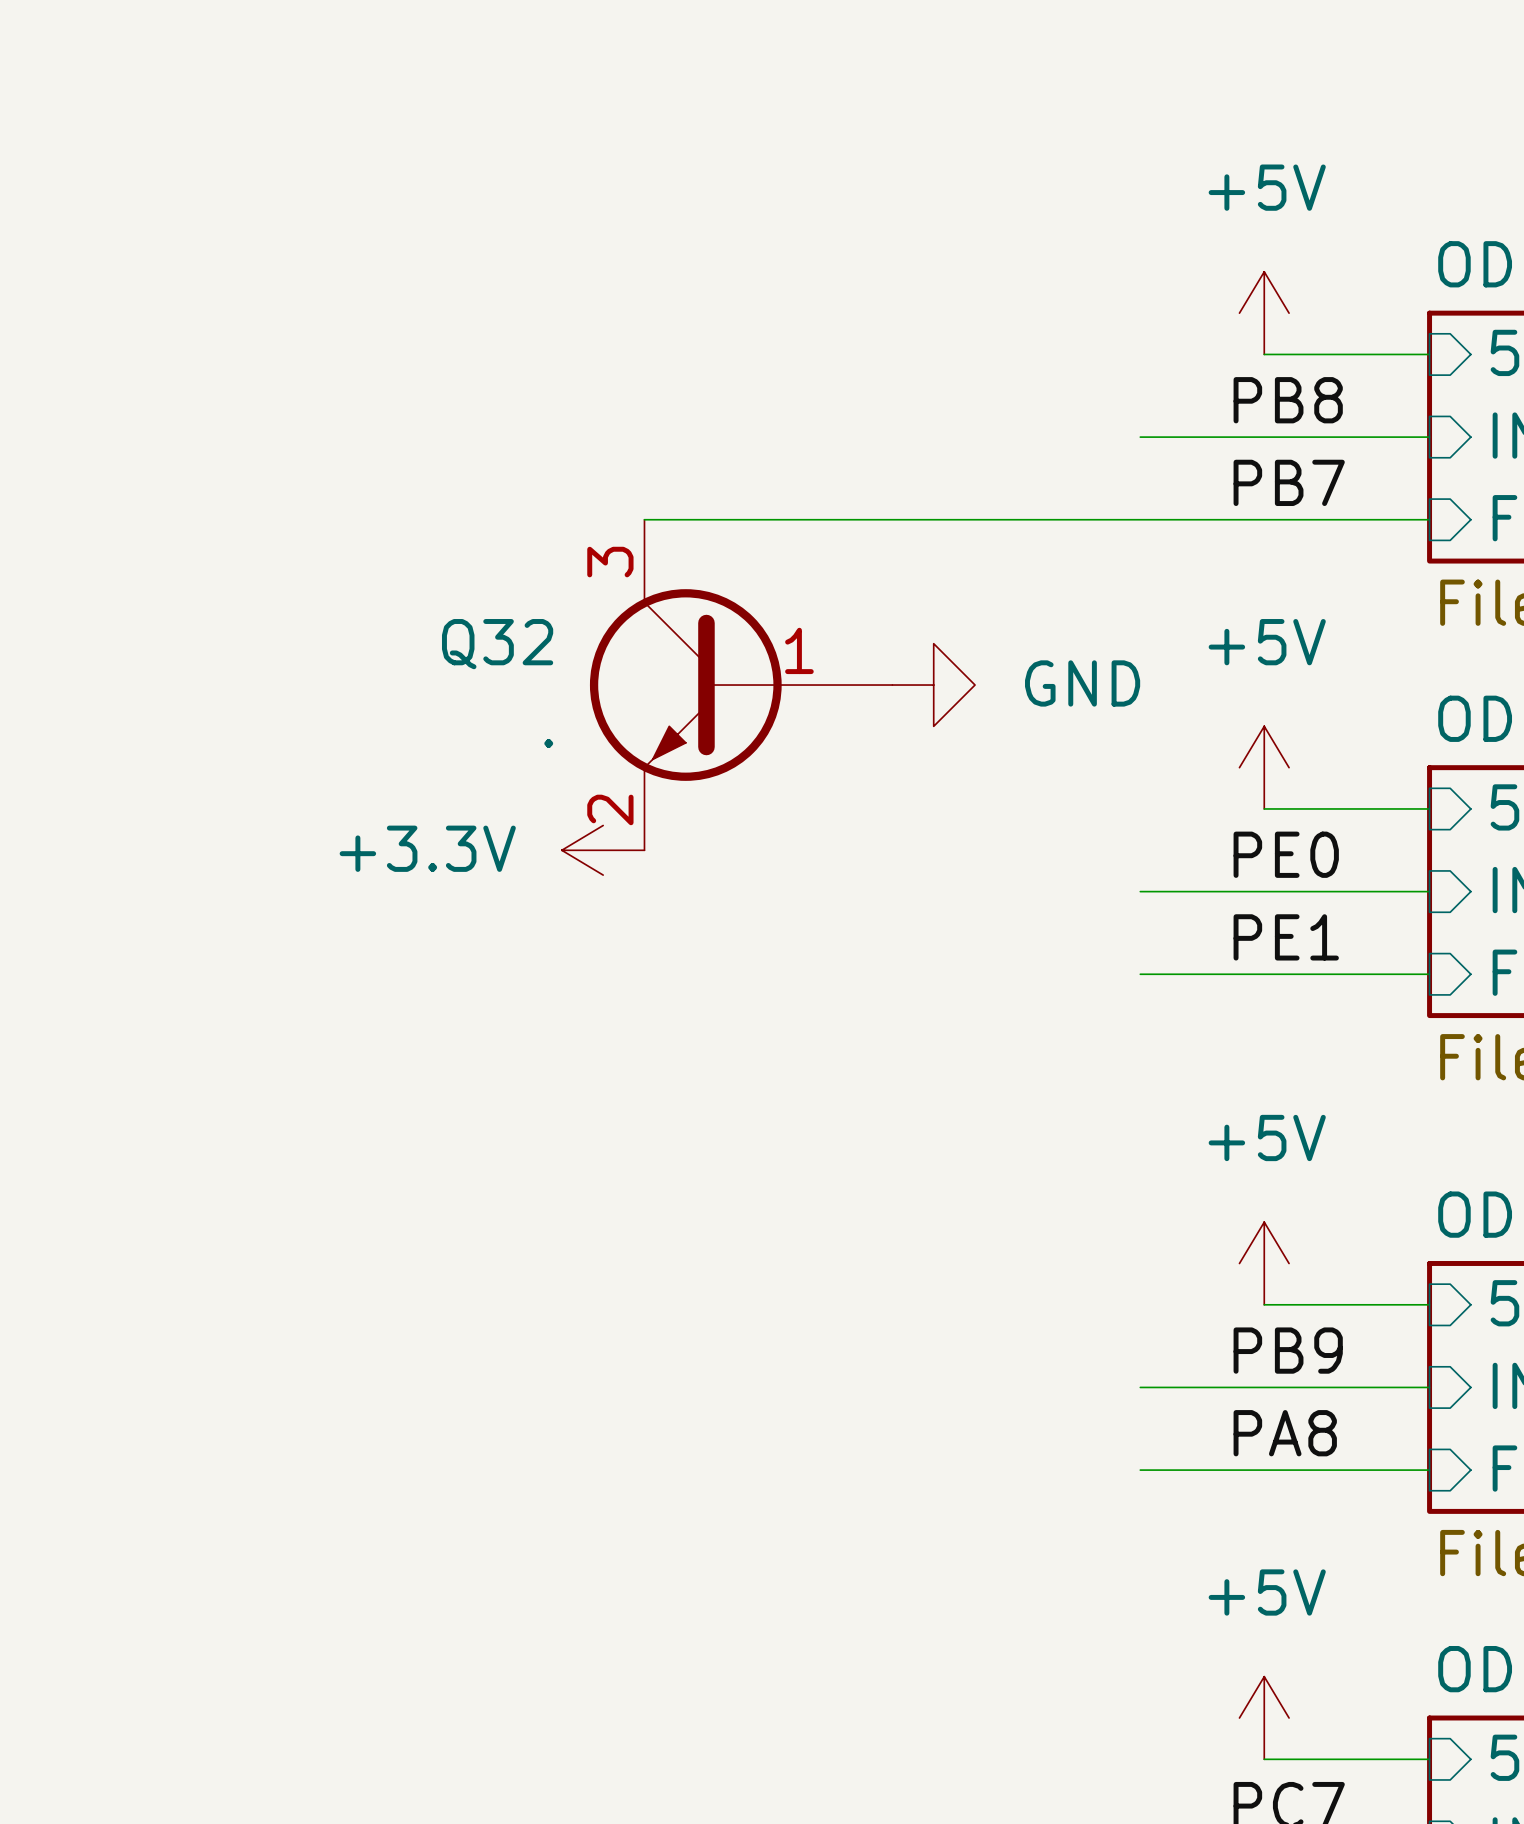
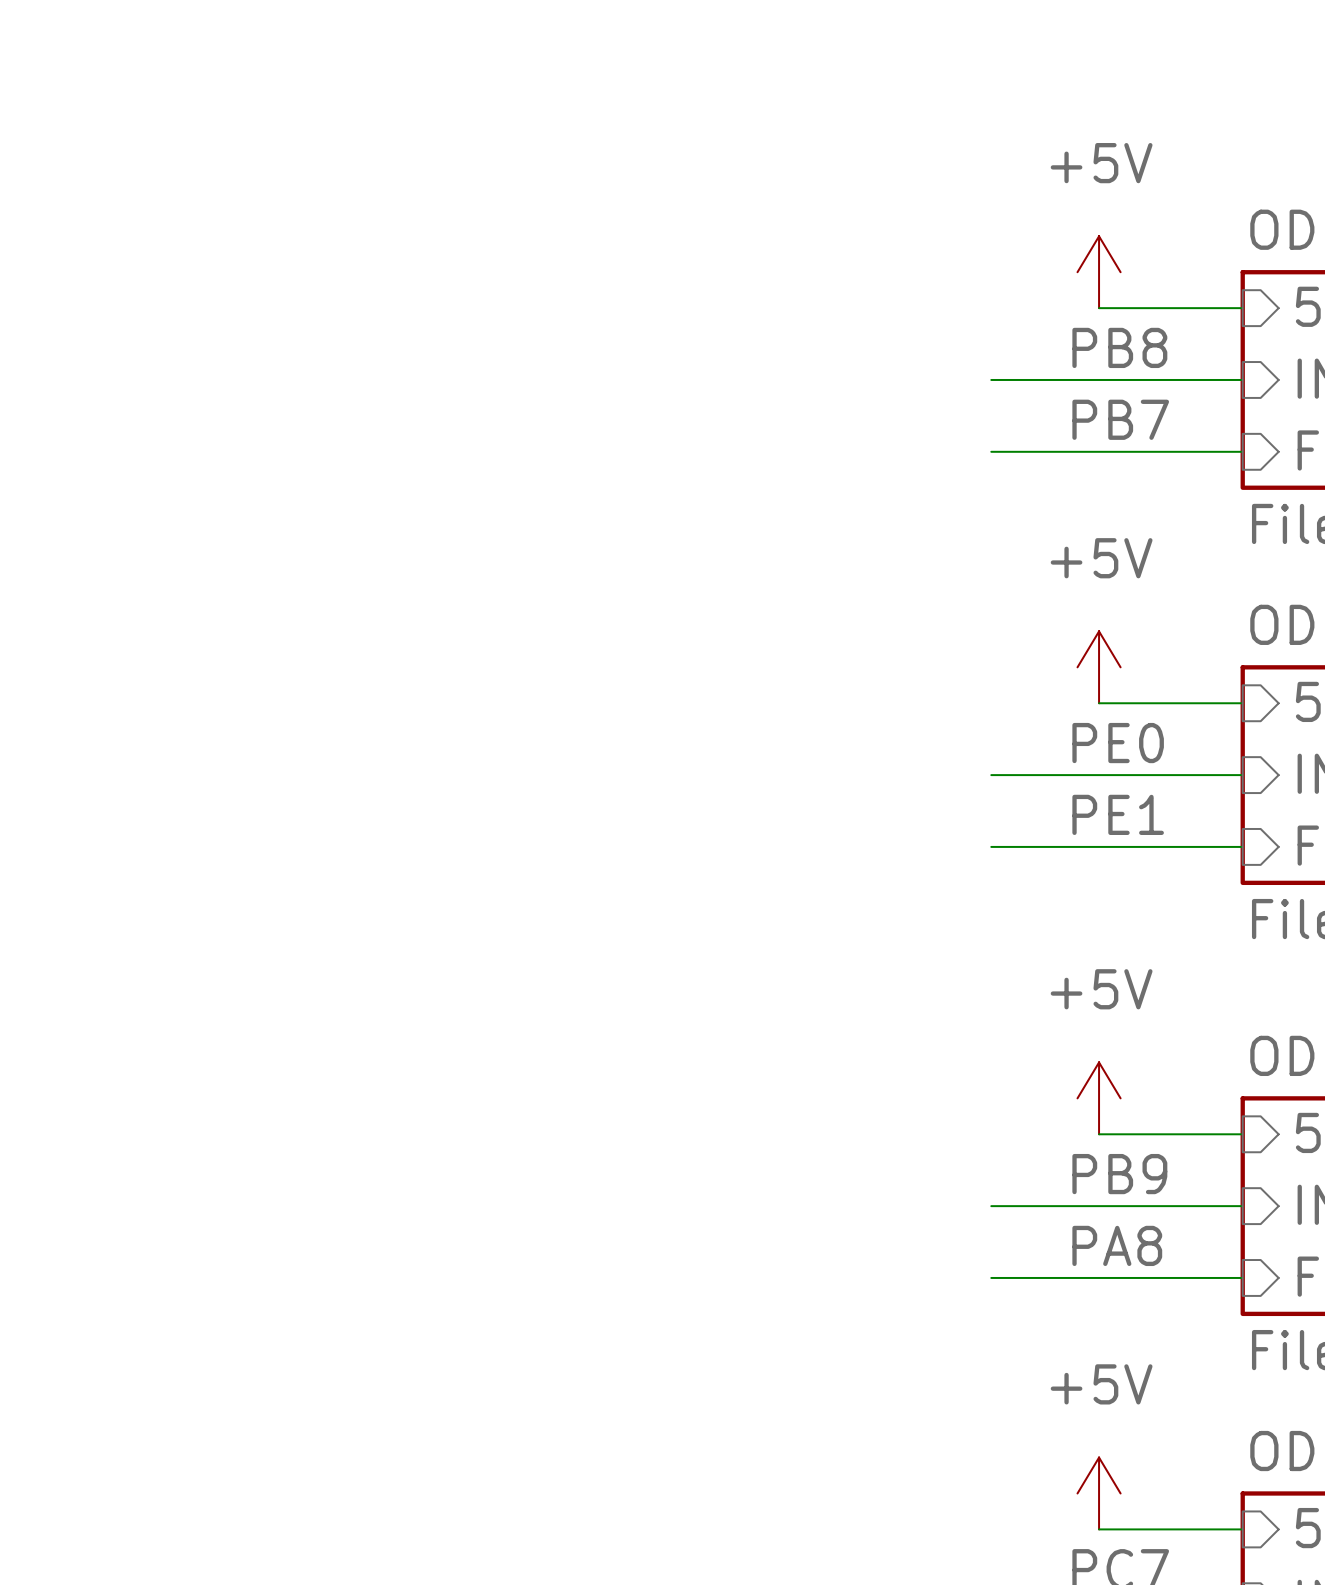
wire: (644, 519) (1140, 519) -> none
Q32: . (741, 685) -> none
power symbol: GND (933, 685) -> none
power symbol: +3.3V (603, 850) -> none

